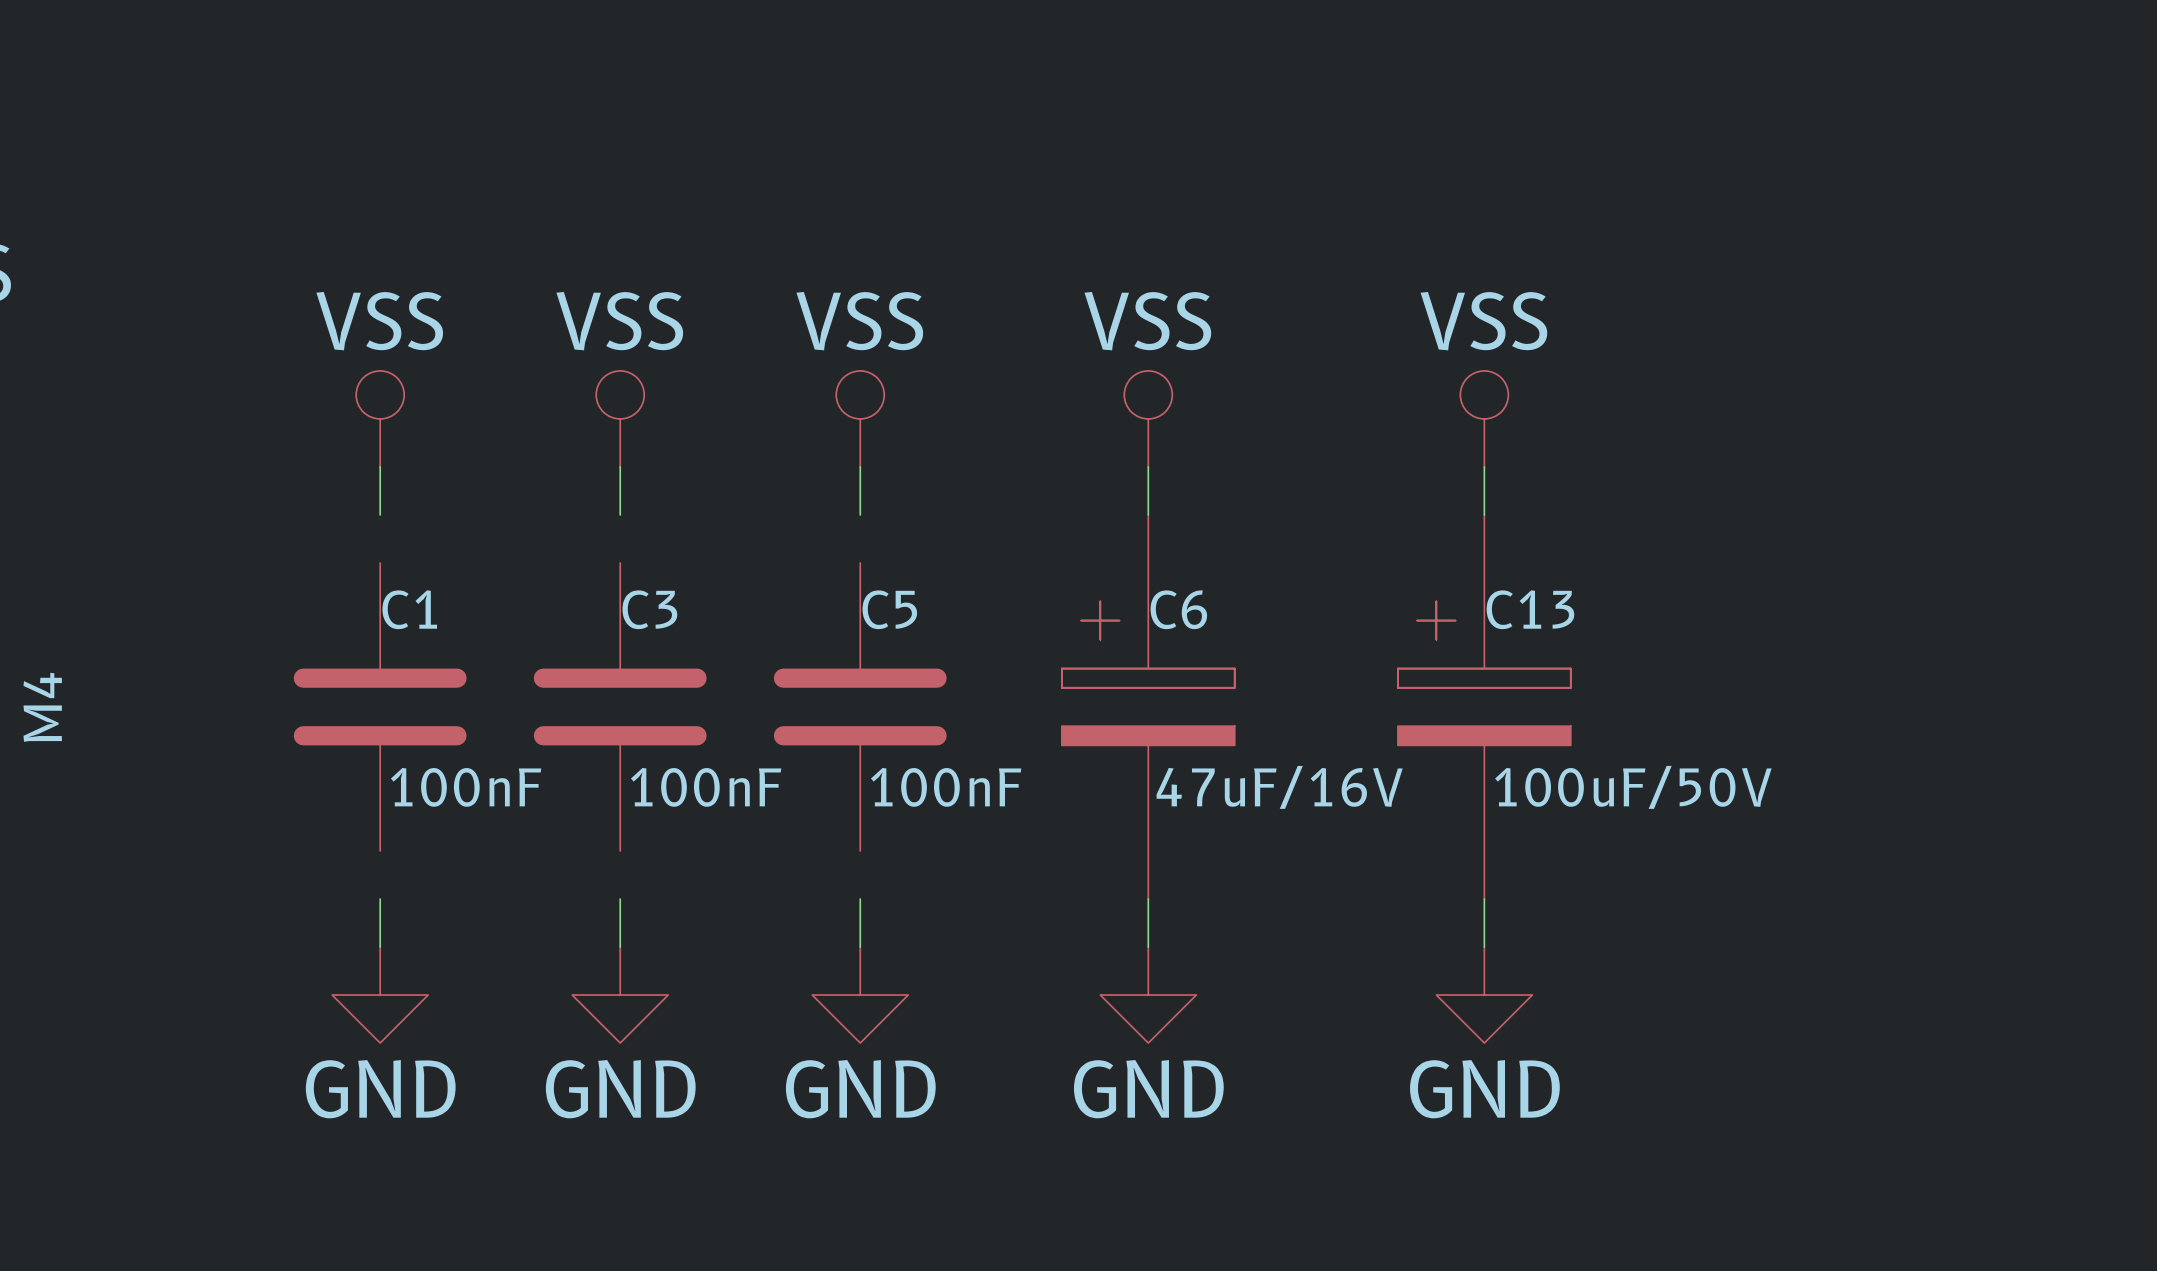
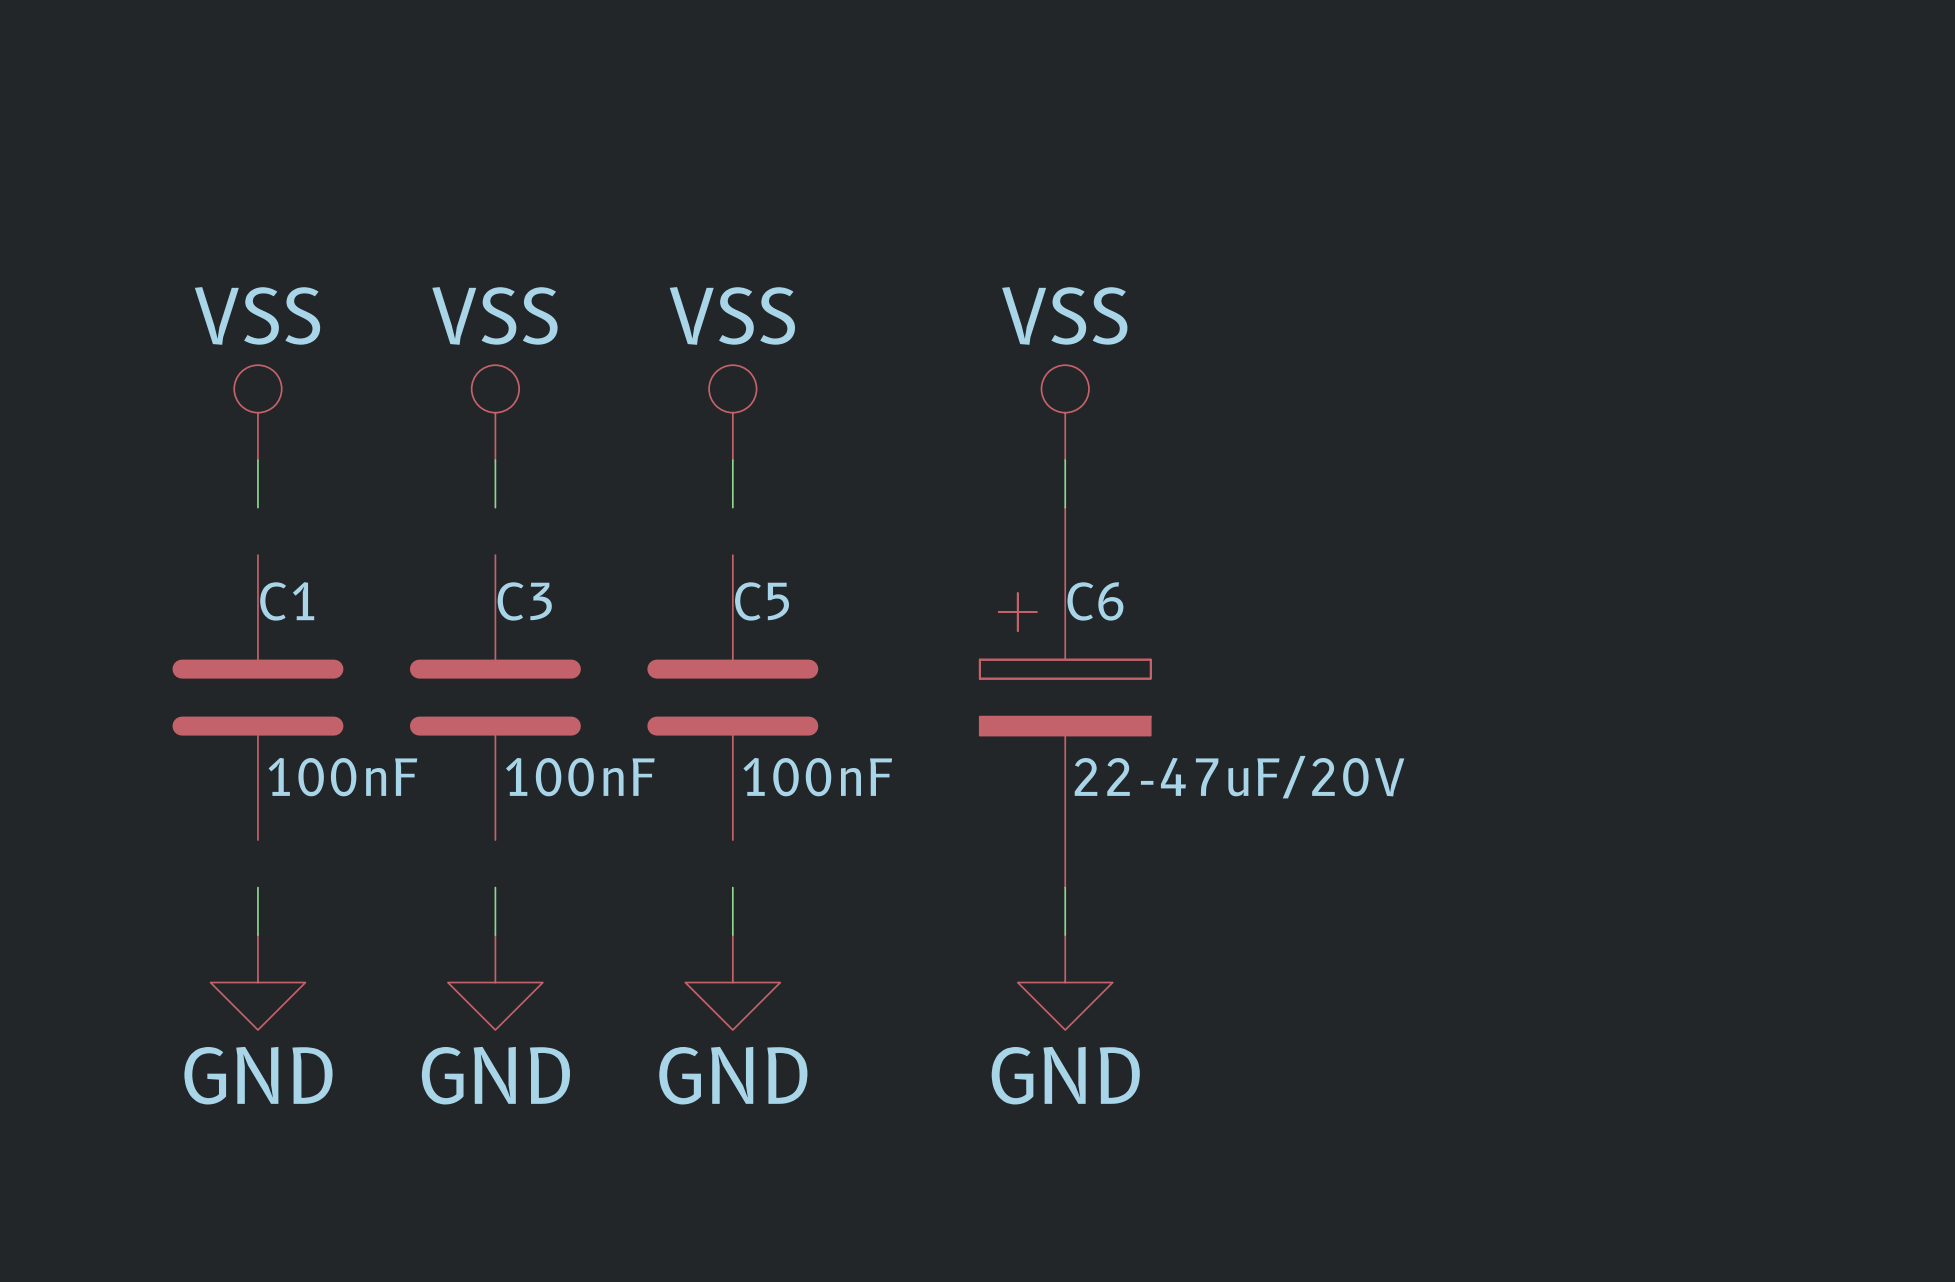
power symbol position: VSS (1148, 418) -> VSS (1065, 412)
power symbol: VSS (1484, 418) -> none
wire: (1148, 466) (1148, 514) -> (1065, 460) (1065, 507)
wire: (1484, 466) (1484, 514) -> none
C6 position: (1148, 706) -> (1065, 697)
C13: 100uF/50V (1484, 706) -> none
C6 value: 47uF/16V (1279, 787) -> 22-47uF/20V (1239, 777)
wire: (1148, 899) (1148, 947) -> (1065, 887) (1065, 935)
wire: (1484, 899) (1484, 947) -> none
power symbol position: GND (1148, 995) -> GND (1065, 982)
power symbol: GND (1484, 995) -> none

